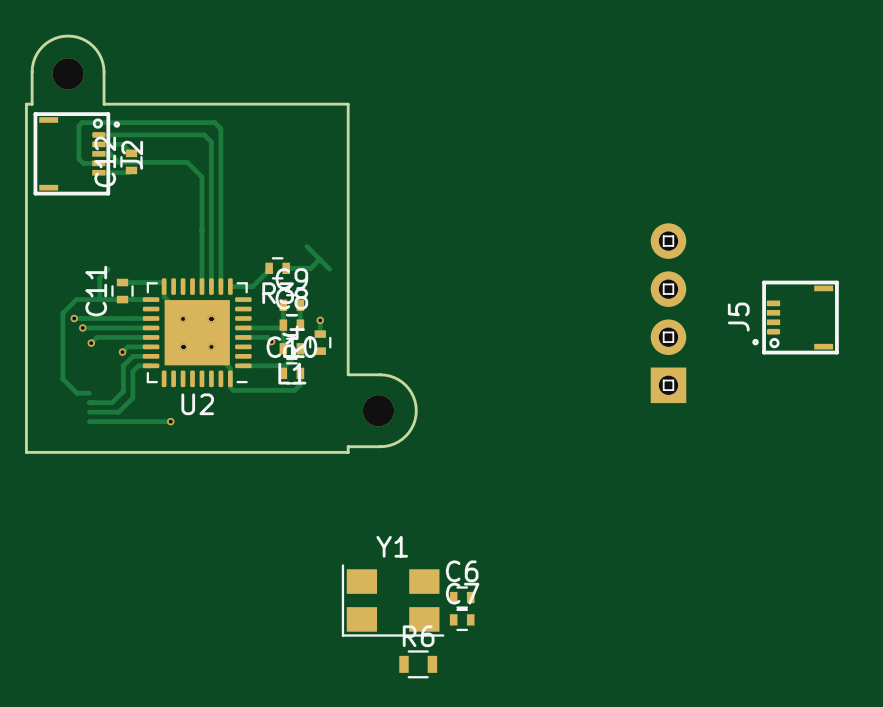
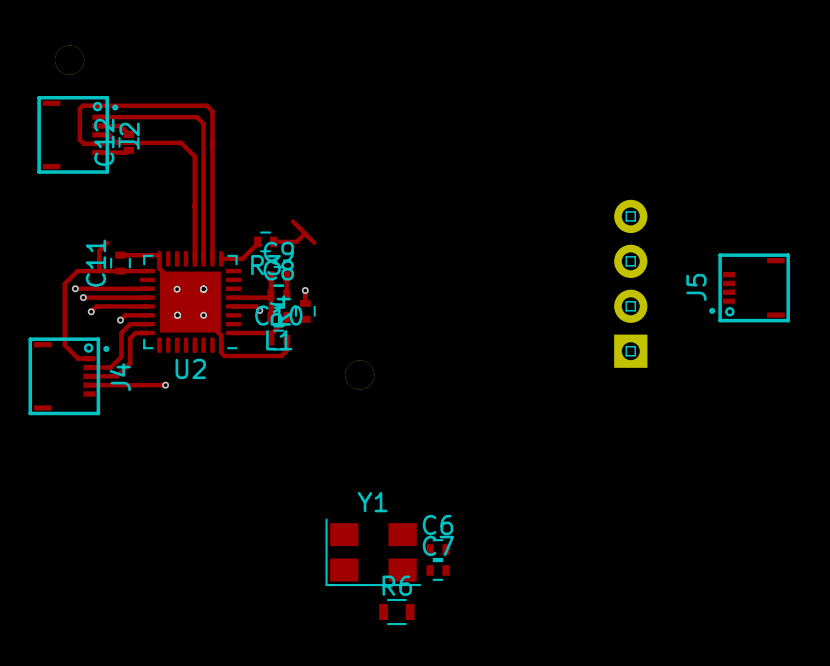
board edge: (380, 374) (348, 374) (348, 104) (104, 104) (103, 67) (99, 54) (93, 46) (81, 38) (68, 36) (54, 38) (42, 46) (36, 54) (32, 67) (32, 104) (26, 104) (26, 452) (348, 452) (348, 446) (389, 445) (402, 439) (411, 428) (416, 415) (416, 406) (413, 397) (405, 385) (394, 377) (380, 374) -> none
J4: none -> (68, 376)

